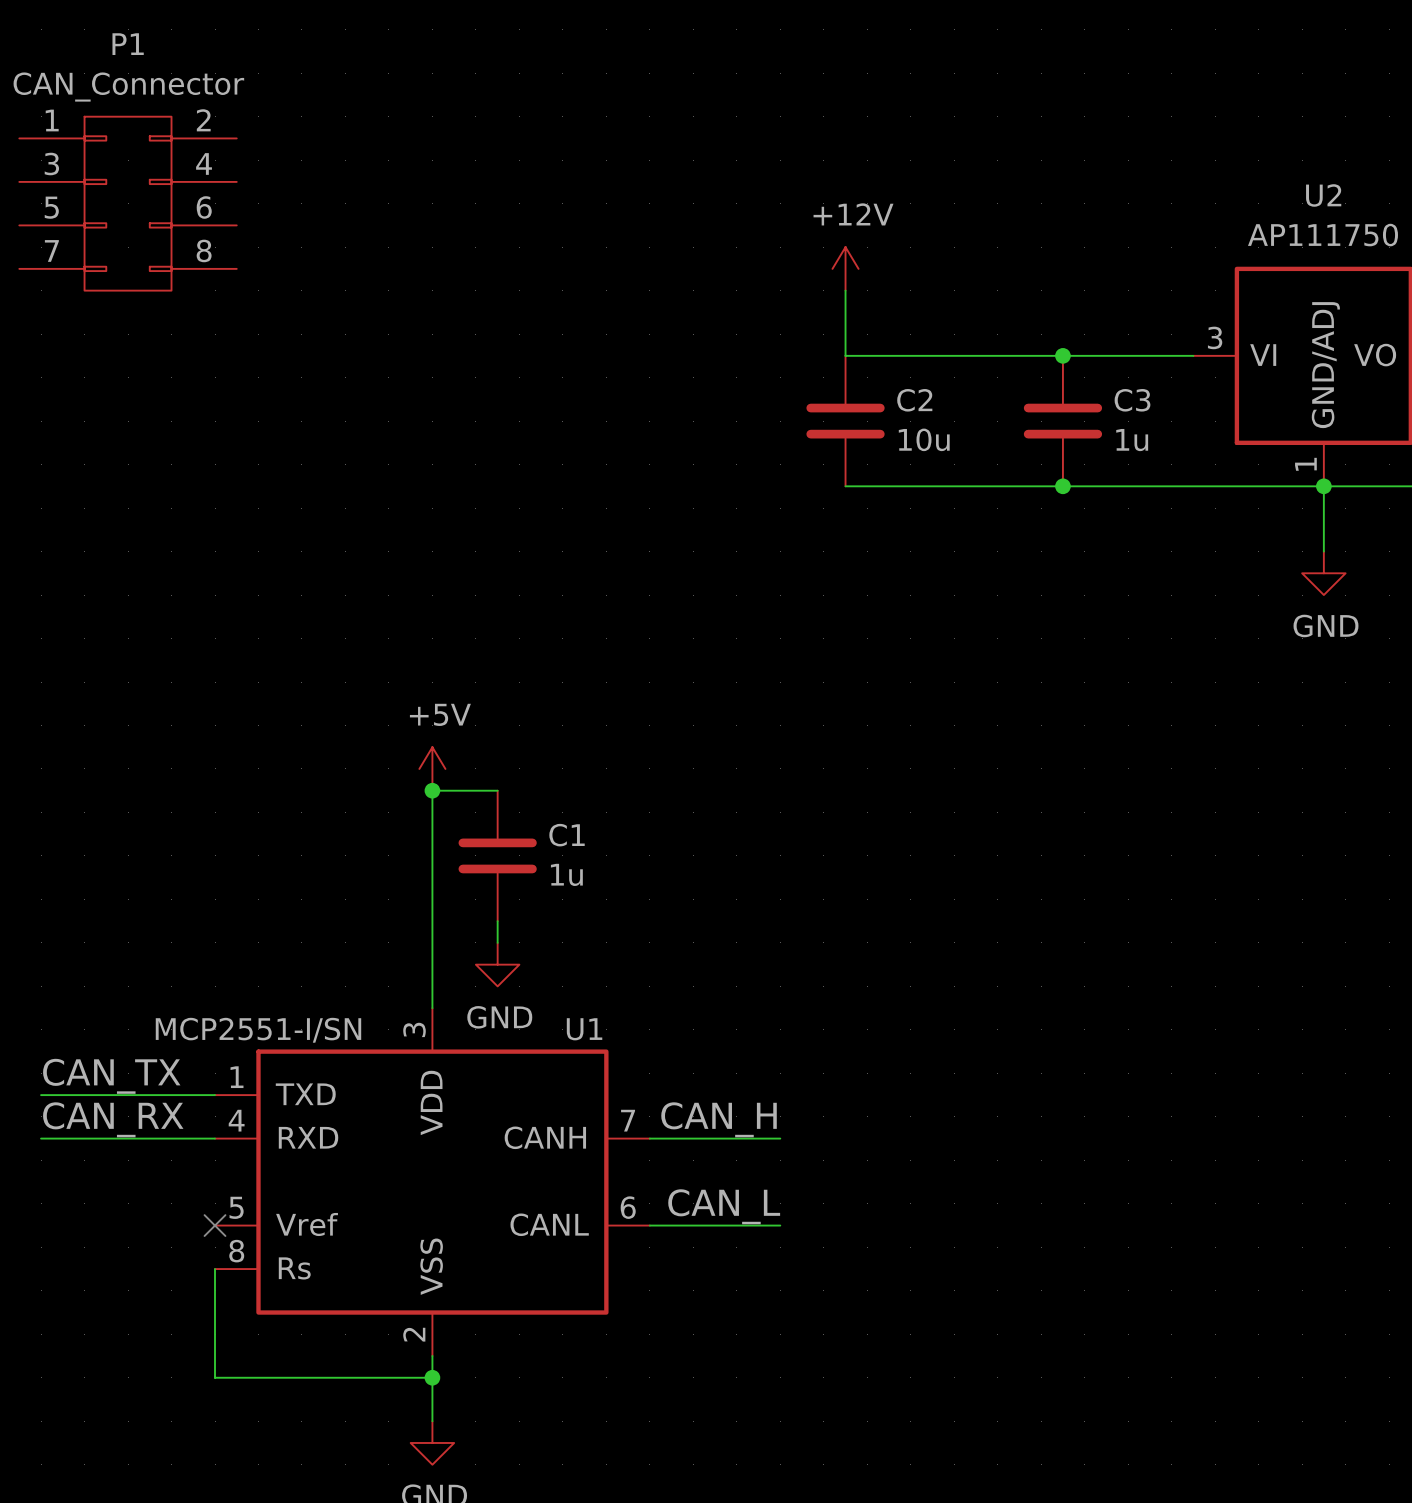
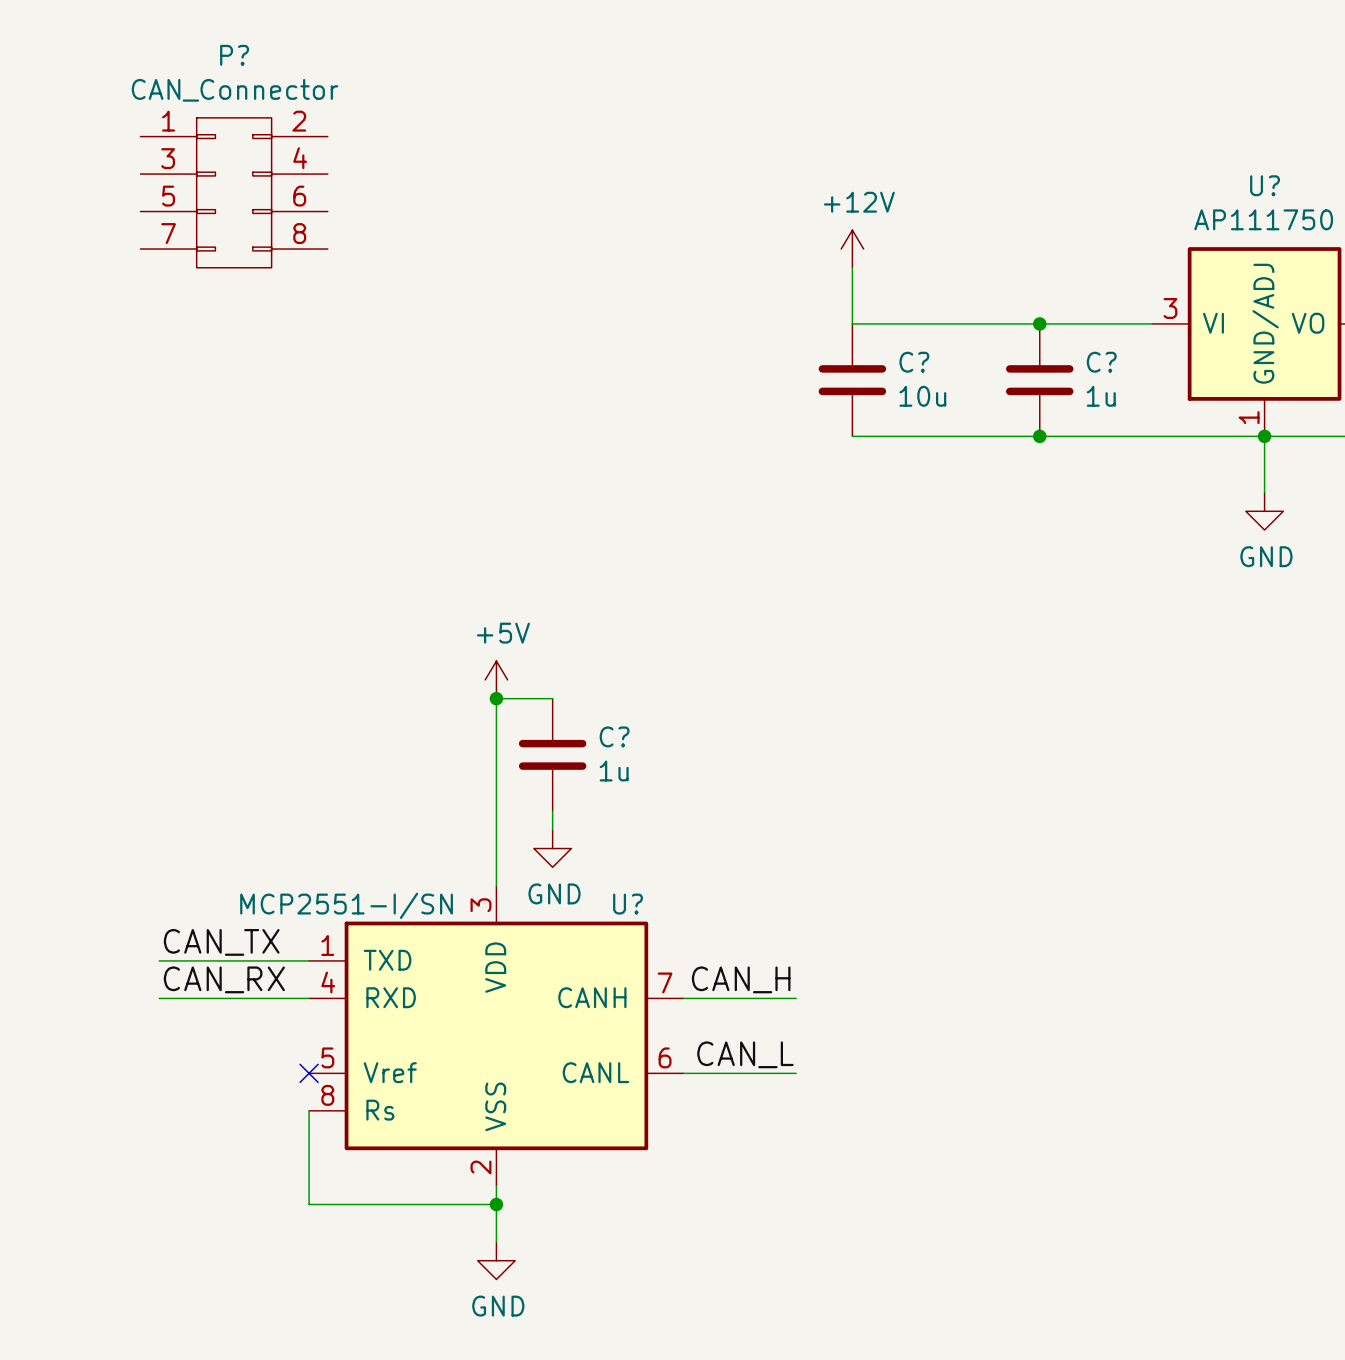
P1 name: P1 (128, 44) -> P? (234, 55)
U2 name: U2 (1323, 195) -> U? (1265, 185)
C2 name: C2 (914, 400) -> C? (914, 362)
C3 name: C3 (1132, 400) -> C? (1101, 362)
C1 name: C1 (567, 835) -> C? (614, 736)
U1 name: U1 (584, 1029) -> U? (628, 904)

